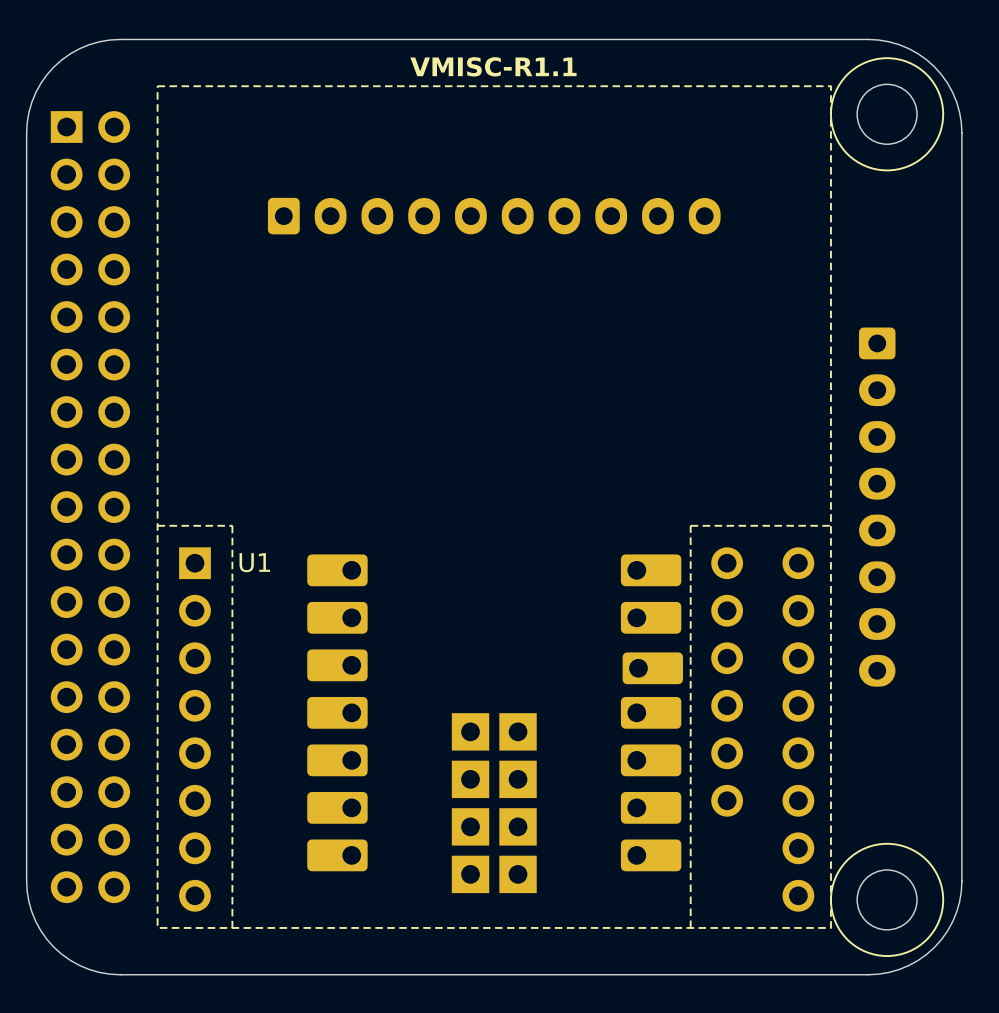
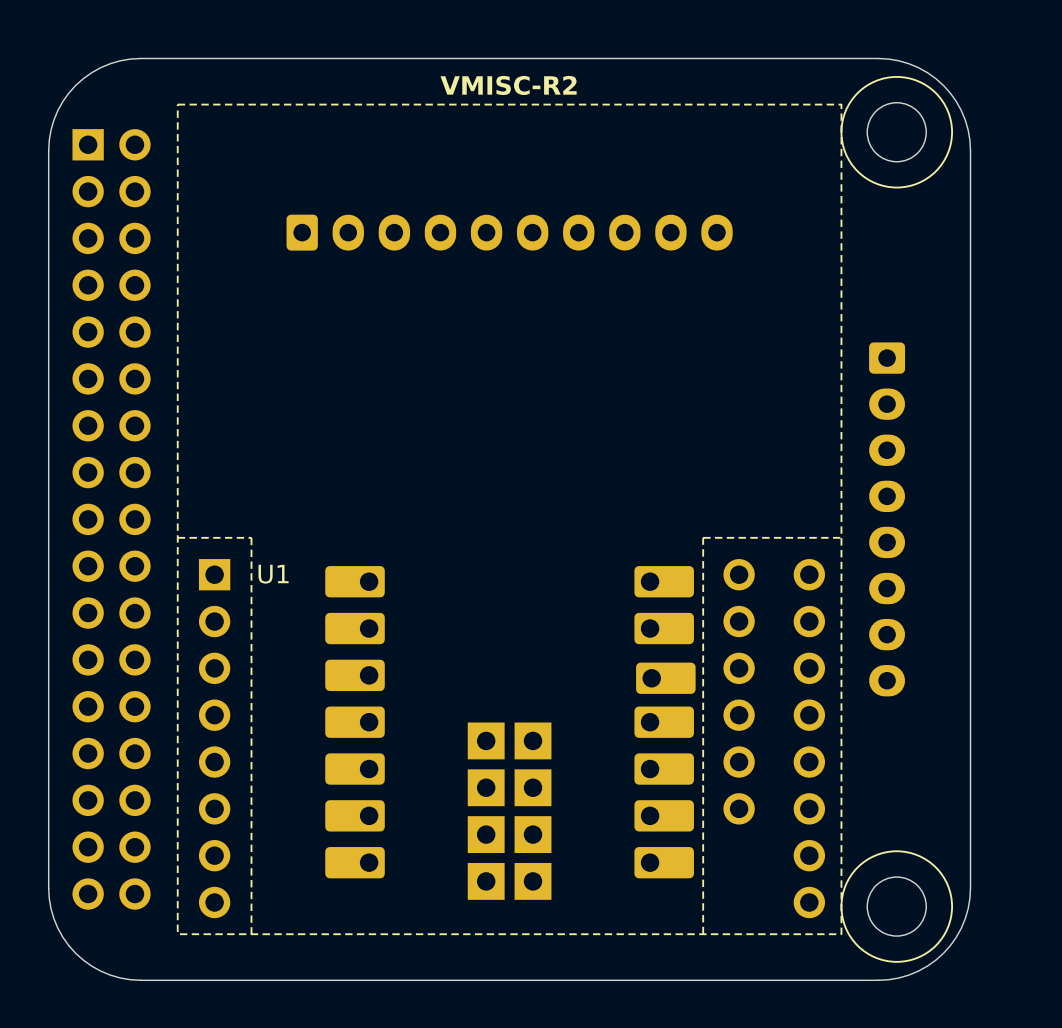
text: VMISC-R1.1 (493, 66) -> VMISC-R2 (508, 85)

